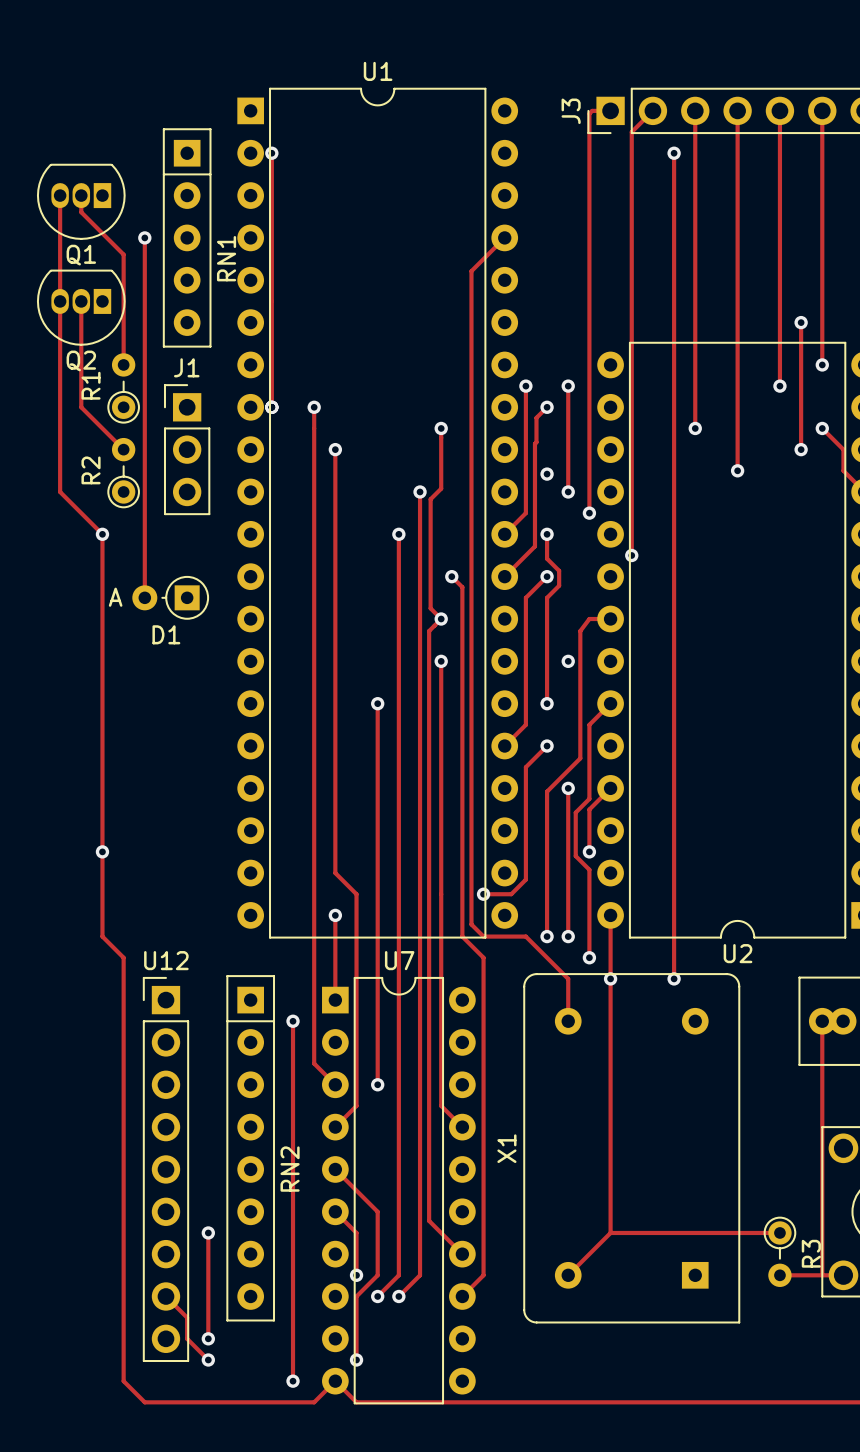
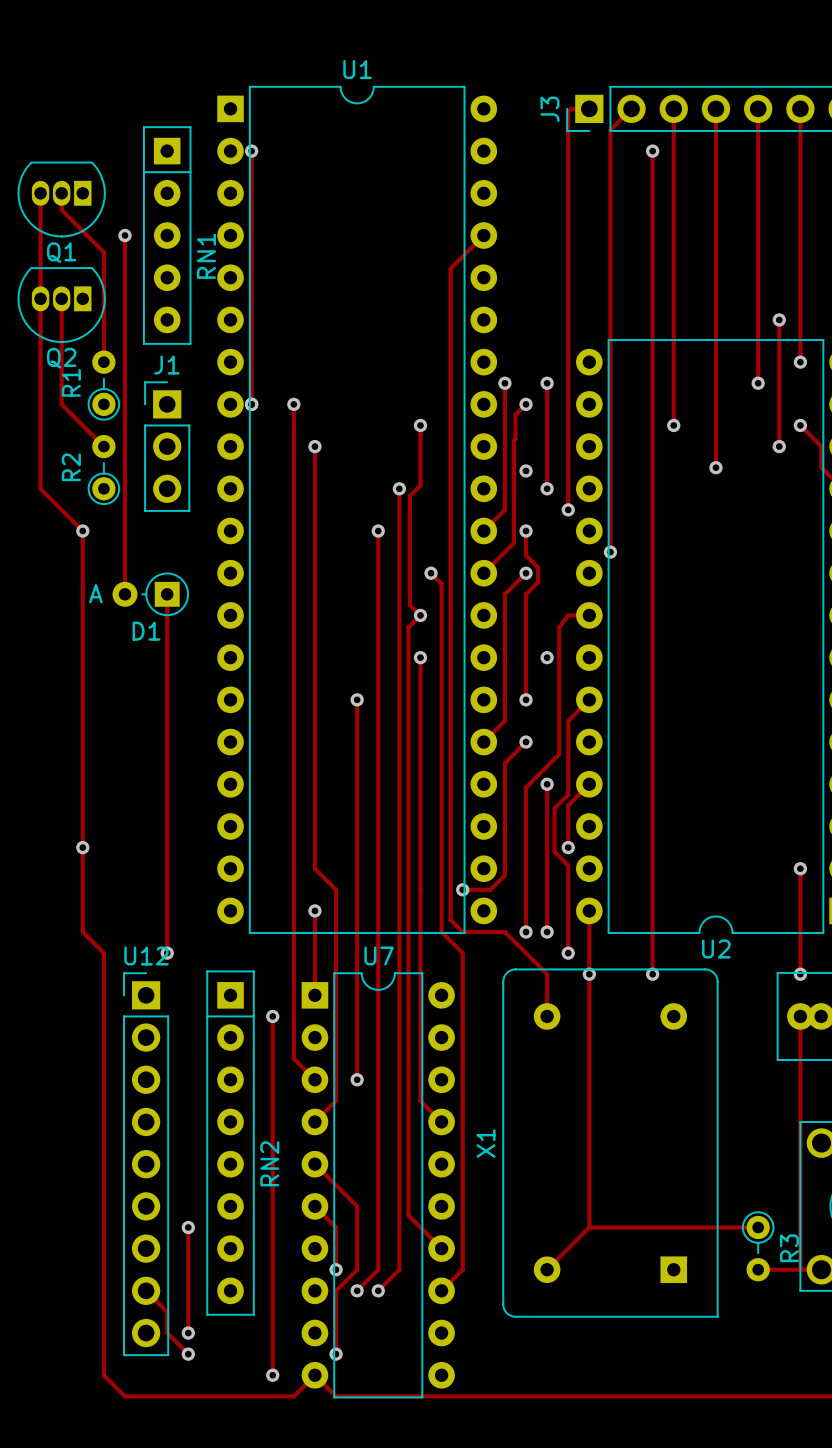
track: none -> (167, 594) (167, 953)
track: none -> (800, 868) (800, 974)
via: none -> (800, 868)
via: none -> (167, 953)
via: none -> (800, 974)

